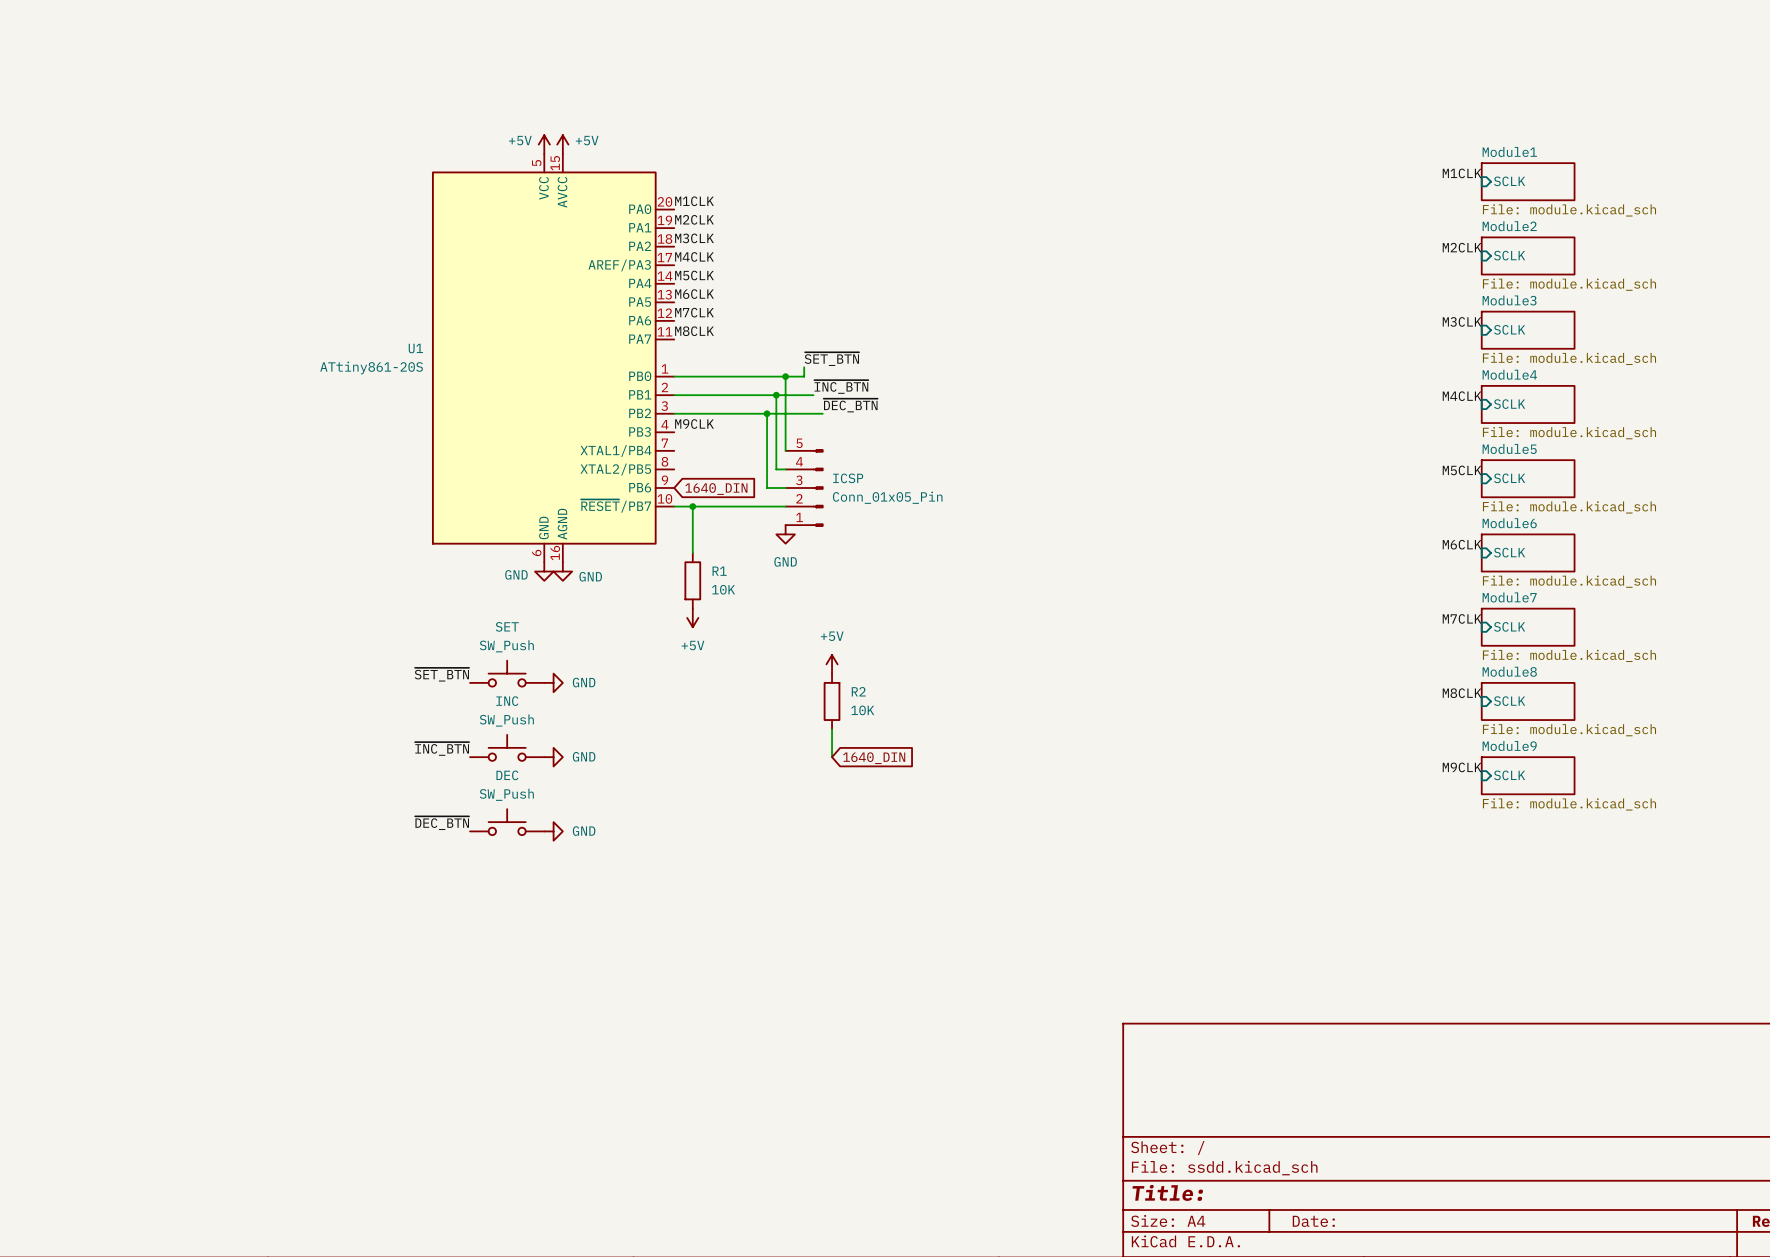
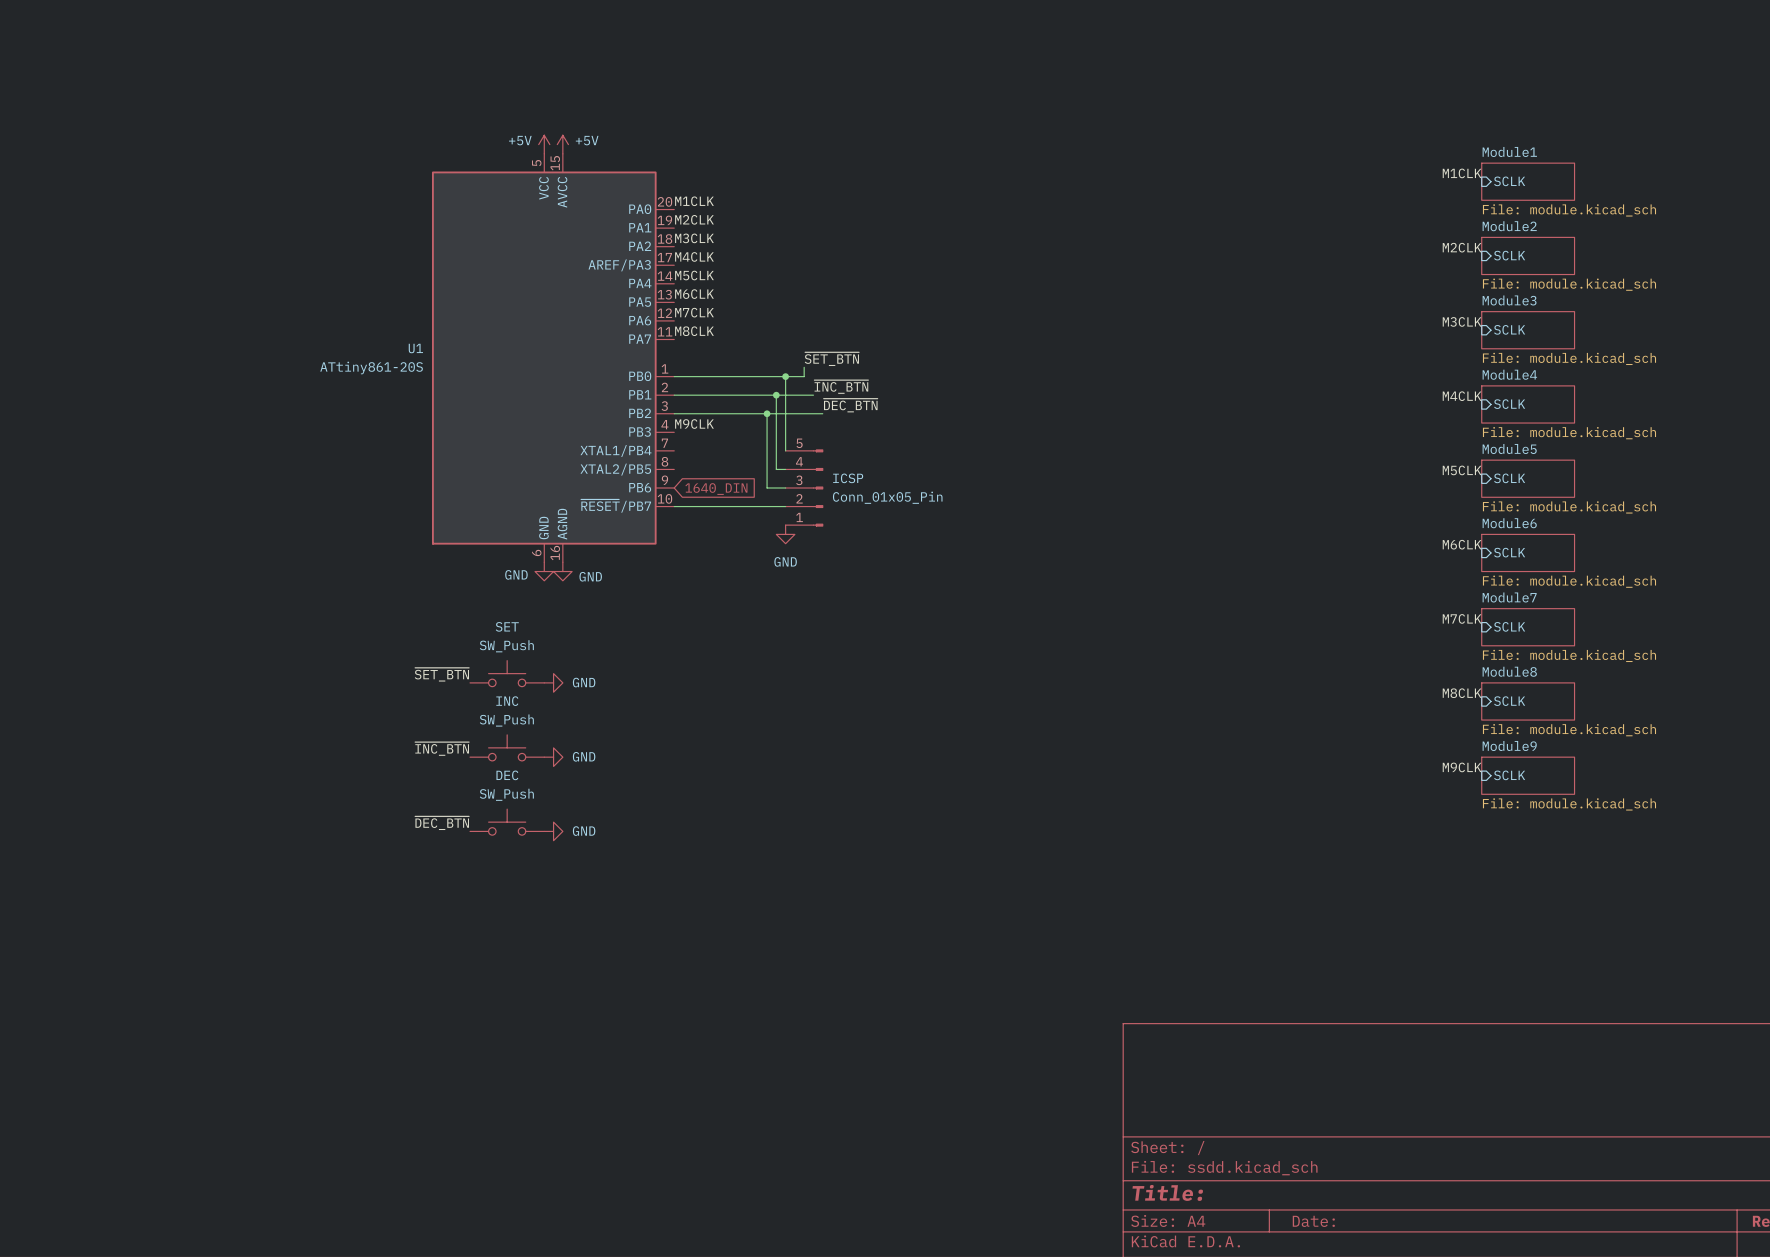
wire: (692, 506) (692, 552) -> none
junction: (692, 506) -> none
R1: 10K (692, 580) -> none
power symbol: +5V (692, 617) -> none
power symbol: +5V (832, 664) -> none
R2: 10K (832, 701) -> none
wire: (832, 729) (832, 757) -> none
global label: 1640_DIN (874, 758) -> none

